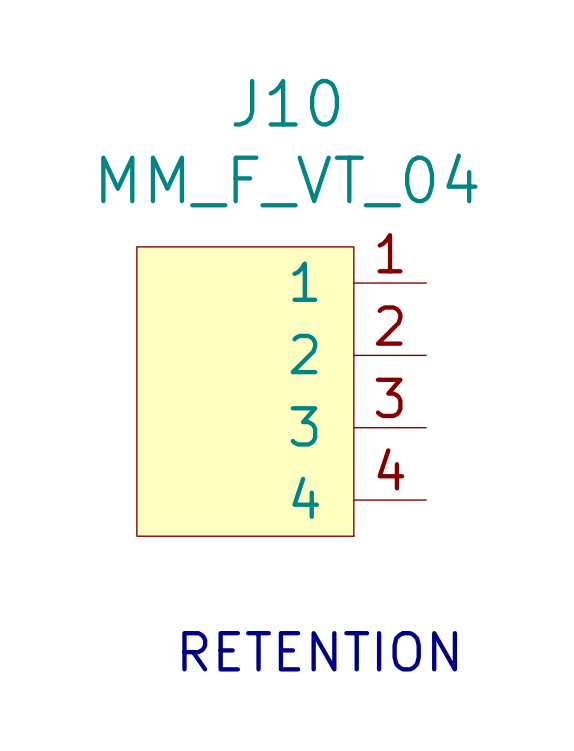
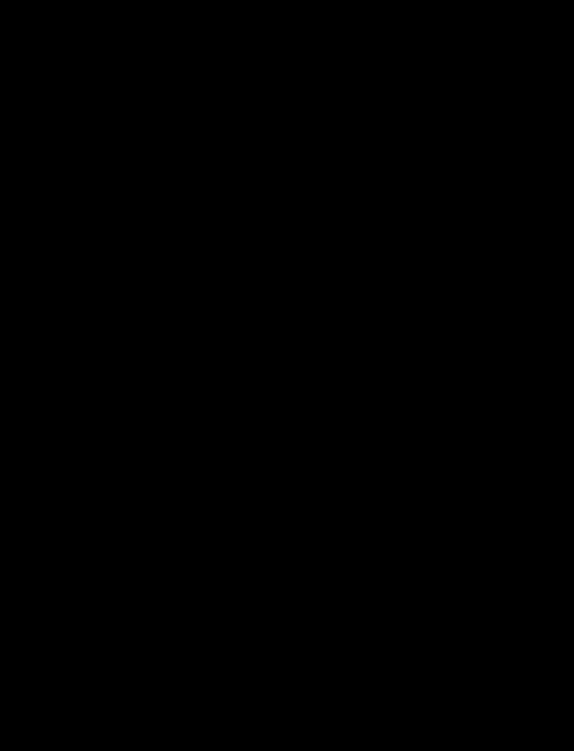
J10: MM_F_VT_04 (281, 391) -> none
text: RETENTION (319, 651) -> none

